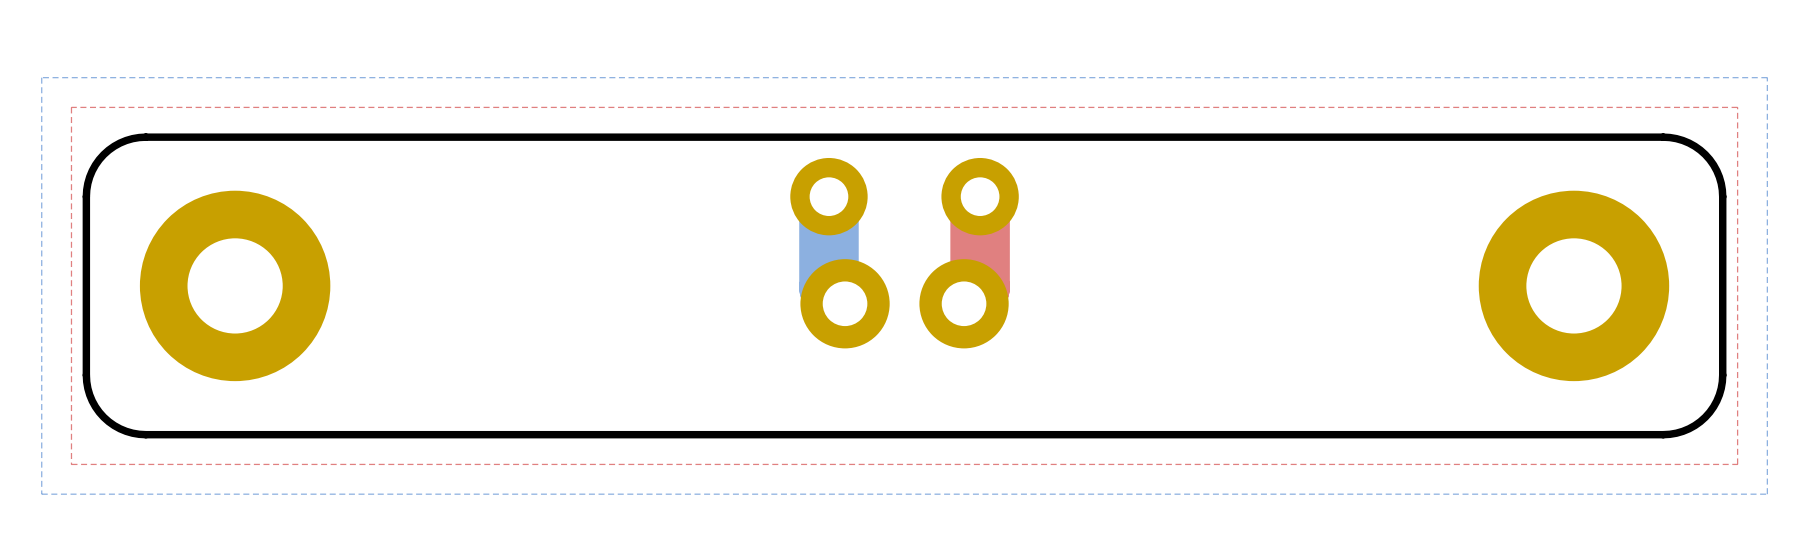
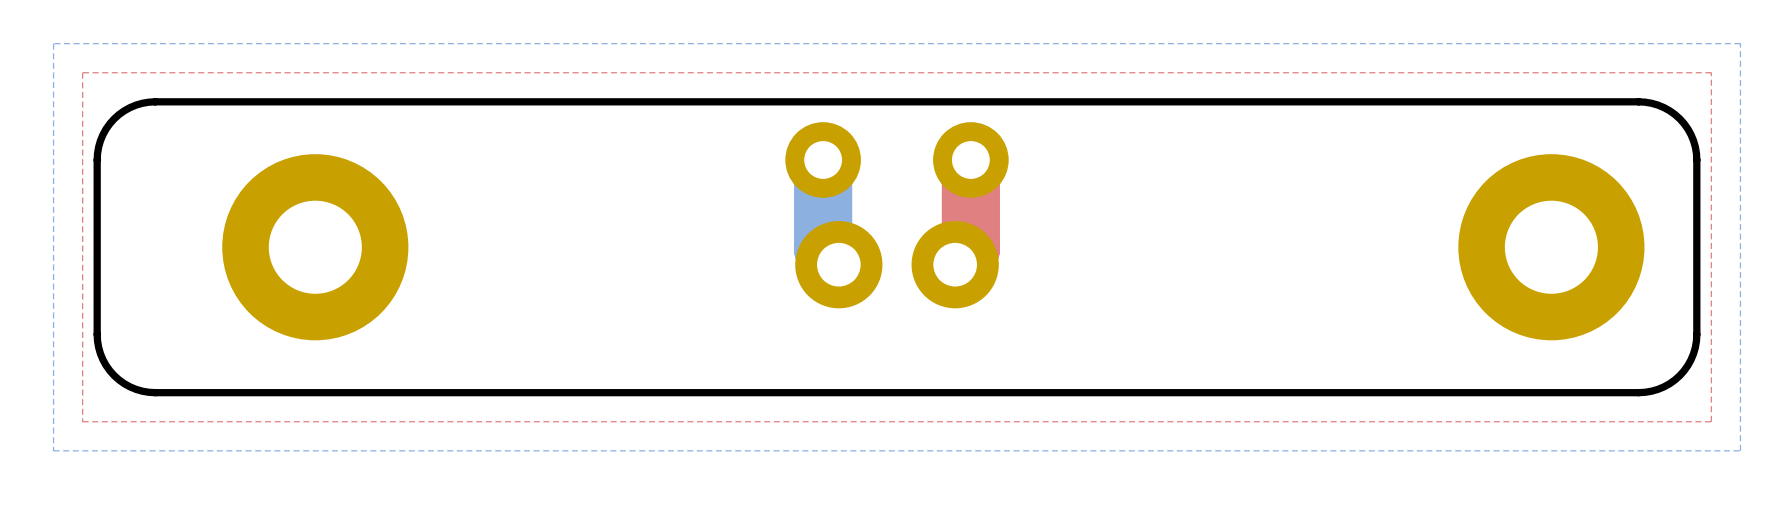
part position: (235, 285) -> (315, 247)

